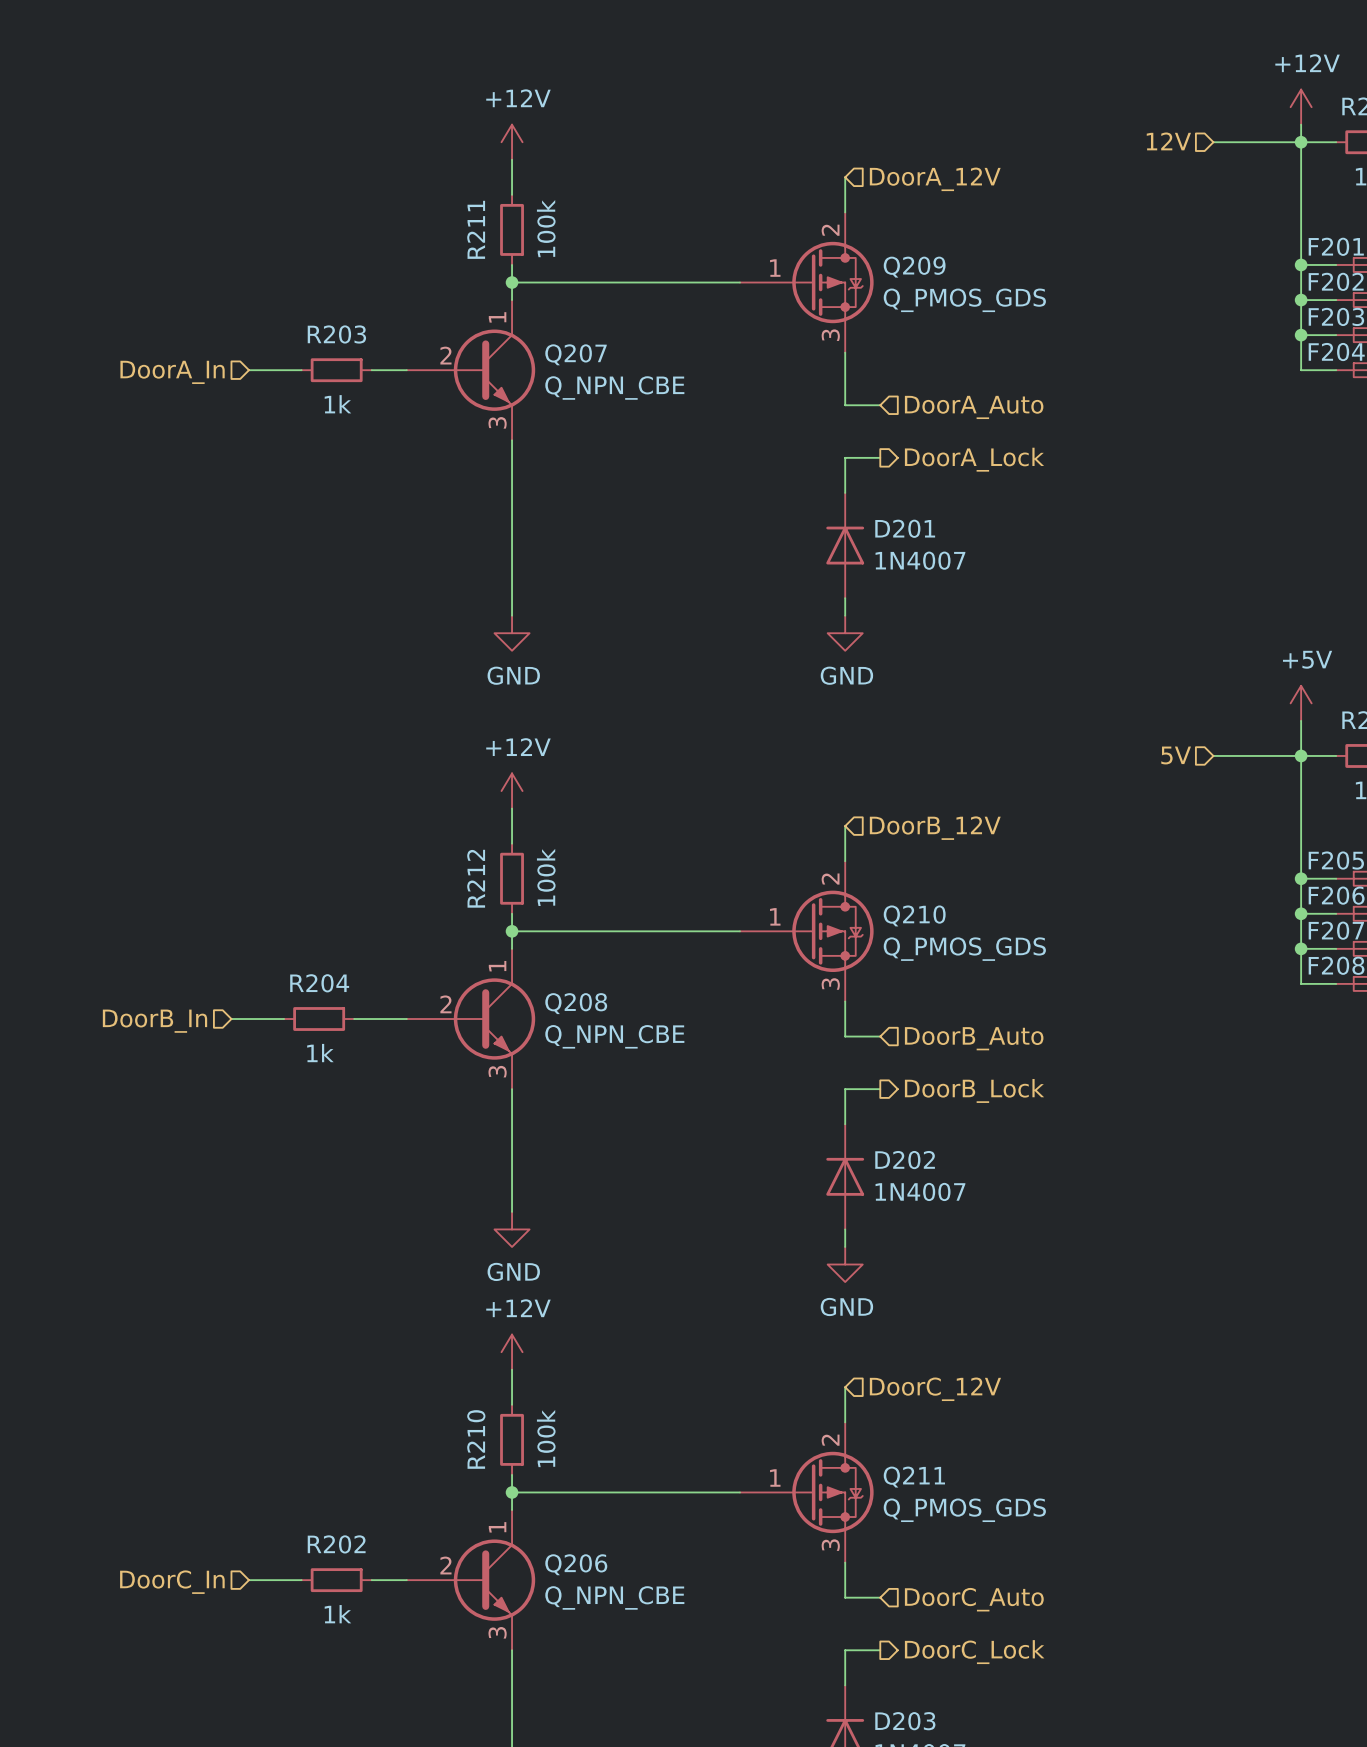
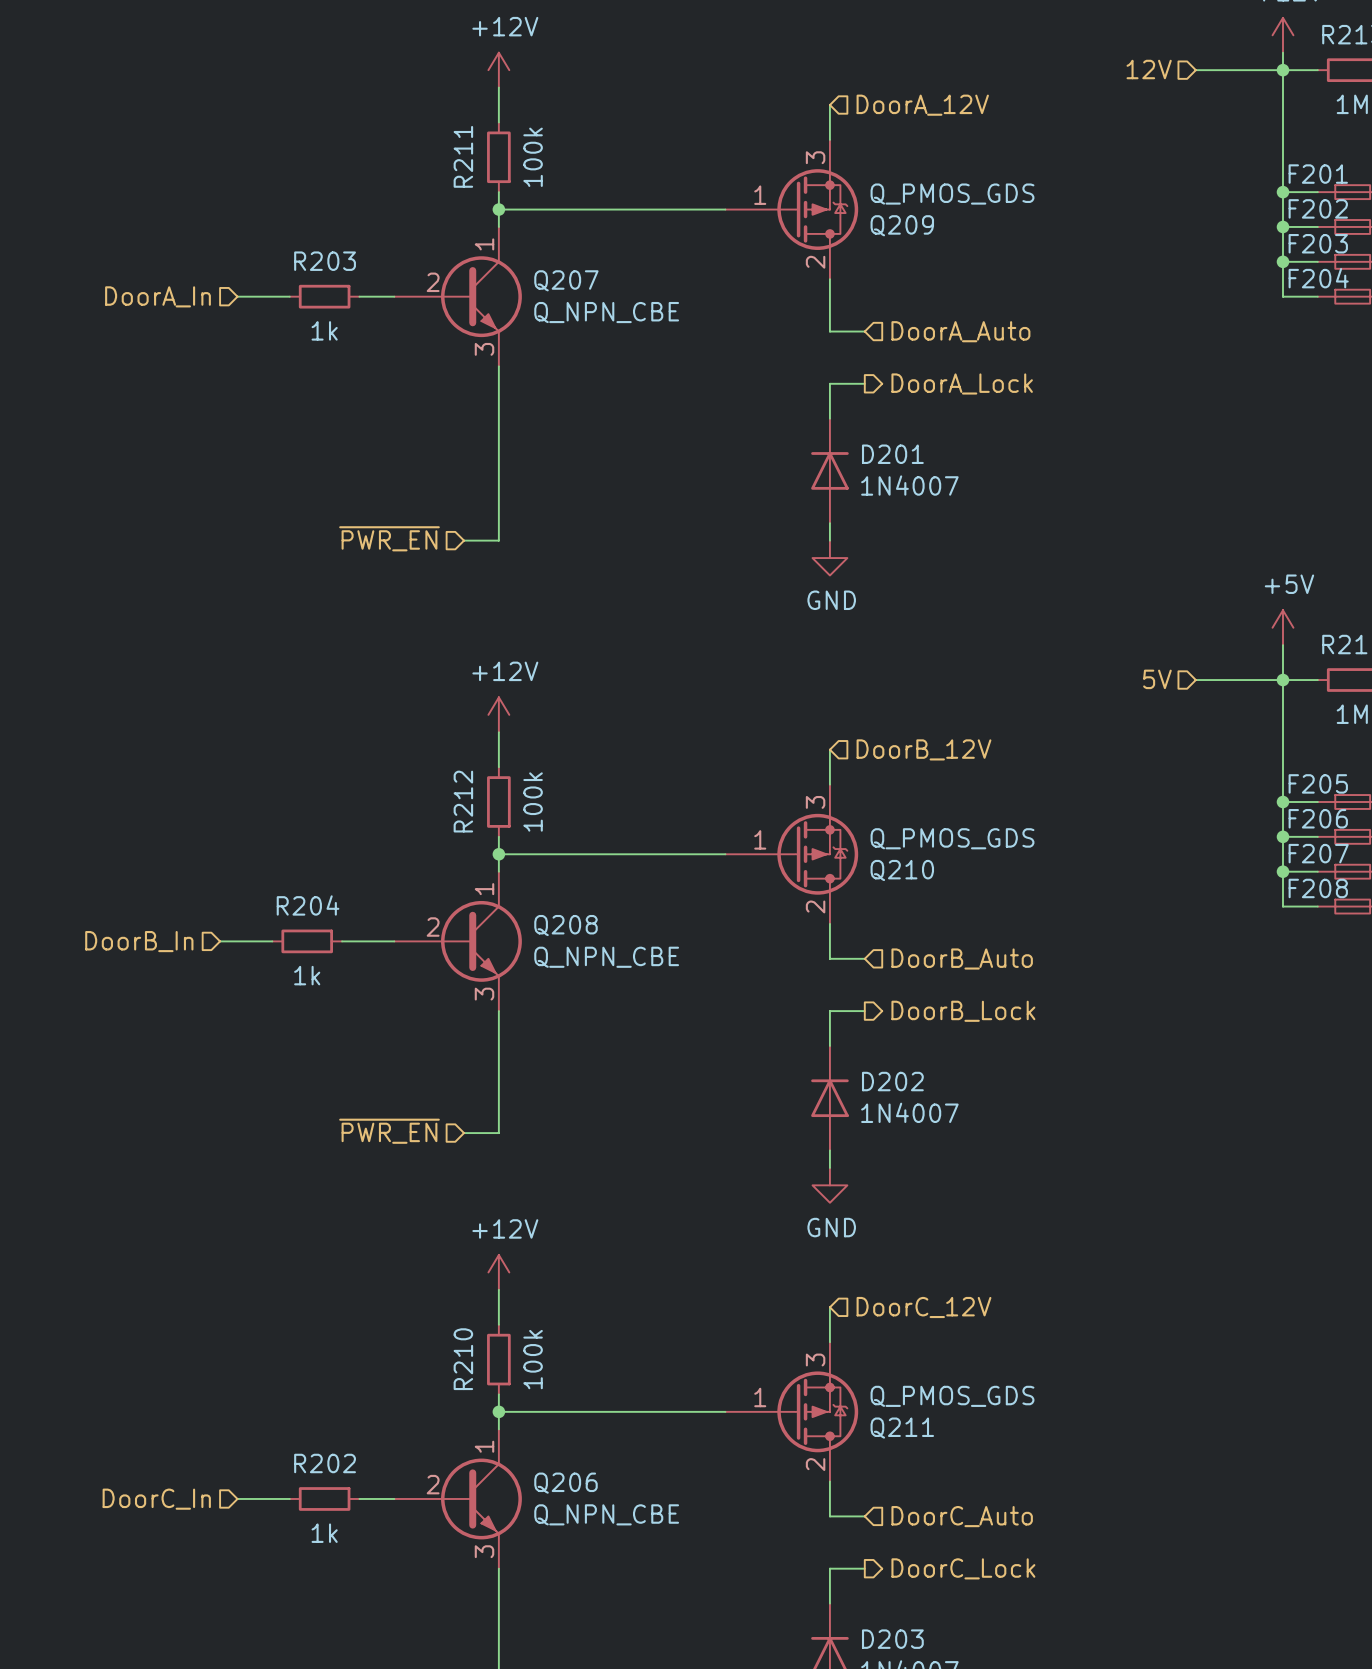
Q209 flip: as is (832, 282) -> up-down (817, 209)
hierarchical label: none -> ~{PWR_EN} (389, 538)
wire: none -> (464, 540) (498, 540)
power symbol: GND (512, 633) -> none
Q210 flip: as is (832, 931) -> up-down (817, 854)
wire: none -> (464, 1133) (498, 1133)
hierarchical label: none -> ~{PWR_EN} (389, 1131)
power symbol: GND (512, 1229) -> none
Q211 flip: as is (832, 1492) -> up-down (817, 1411)

